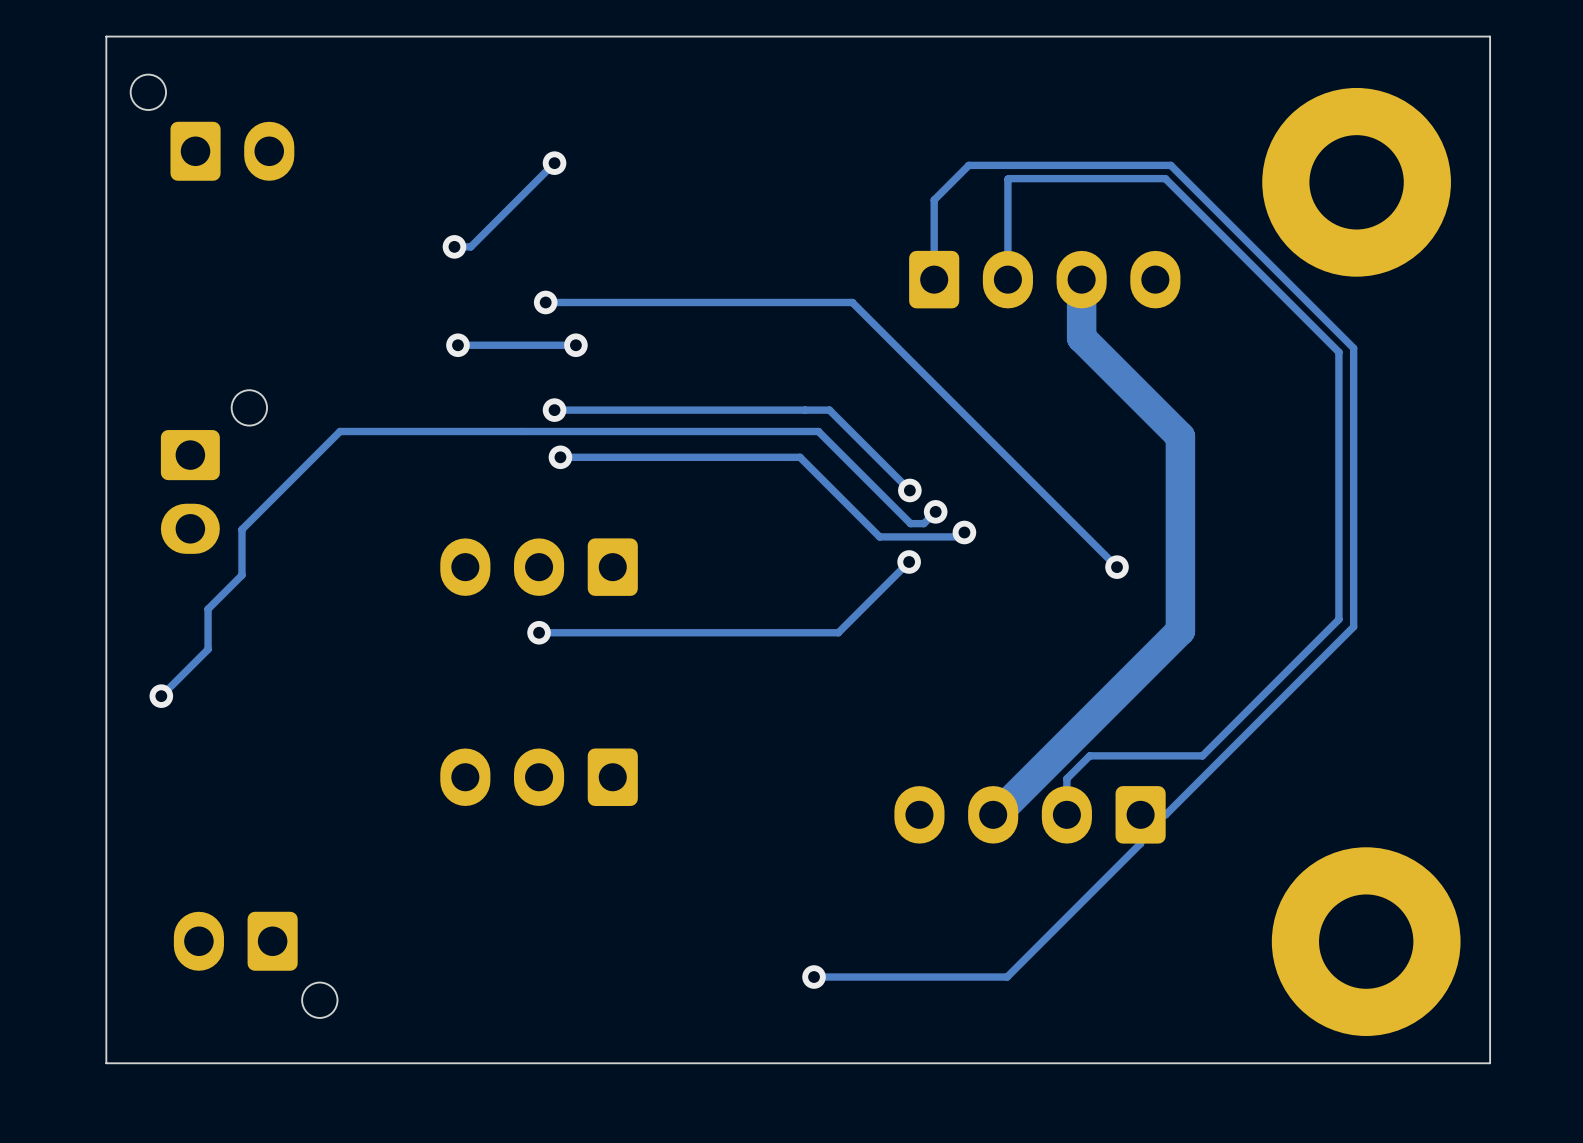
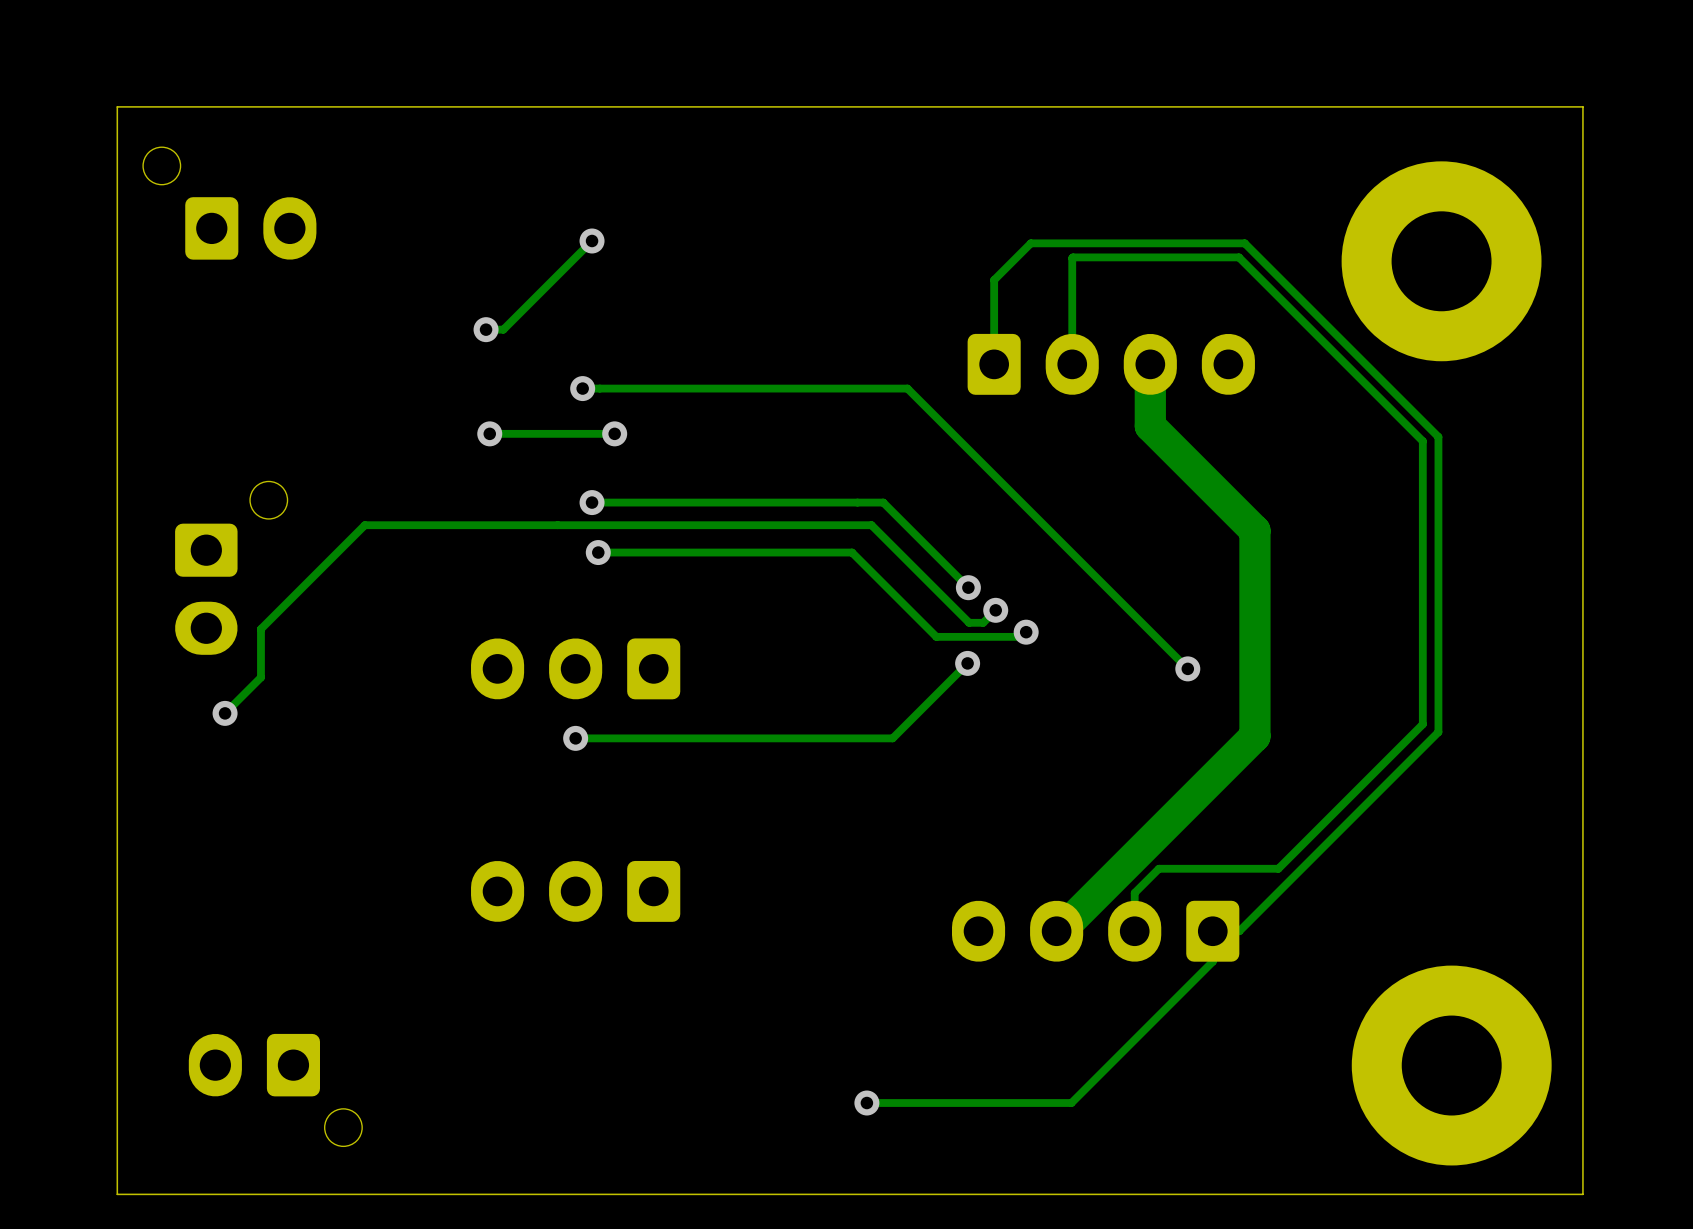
track: (208, 609) (208, 649) (161, 696) -> none
via position: (161, 696) -> (225, 713)

